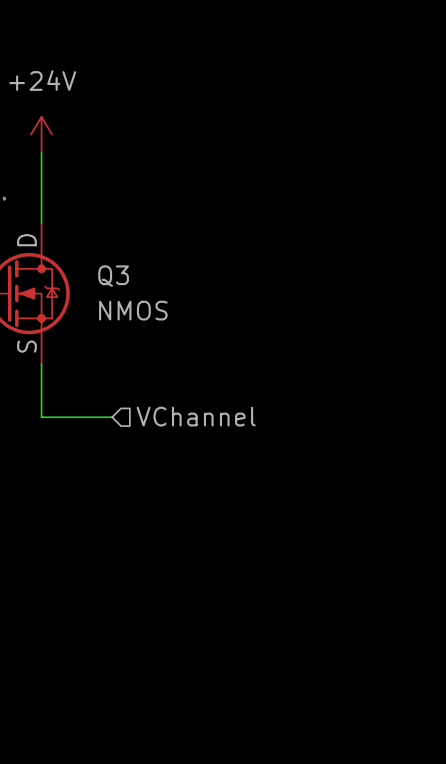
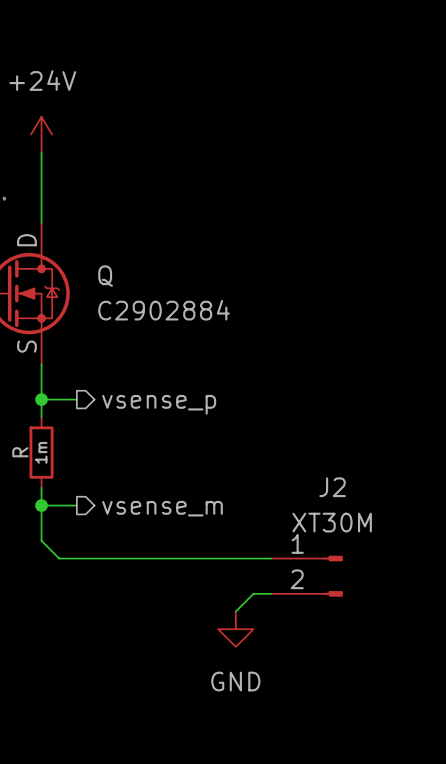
Q3 name: Q3 (113, 276) -> Q (105, 276)
Q3 value: NMOS (133, 310) -> C2902884 (164, 310)
wire: none -> (41, 399) (76, 399)
junction: none -> (41, 399)
hierarchical label: none -> vsense_p (159, 404)
hierarchical label: VChannel (196, 416) -> none
wire: (41, 417) (112, 417) -> none
R: none -> 1m (41, 452)
wire: none -> (41, 487) (41, 540) (59, 558) (271, 558)
wire: none -> (41, 505) (76, 505)
junction: none -> (41, 505)
hierarchical label: none -> vsense_m (162, 508)
J2: none -> XT30M (307, 576)
wire: none -> (271, 593) (253, 593) (235, 611)
power symbol: none -> GND (235, 629)

